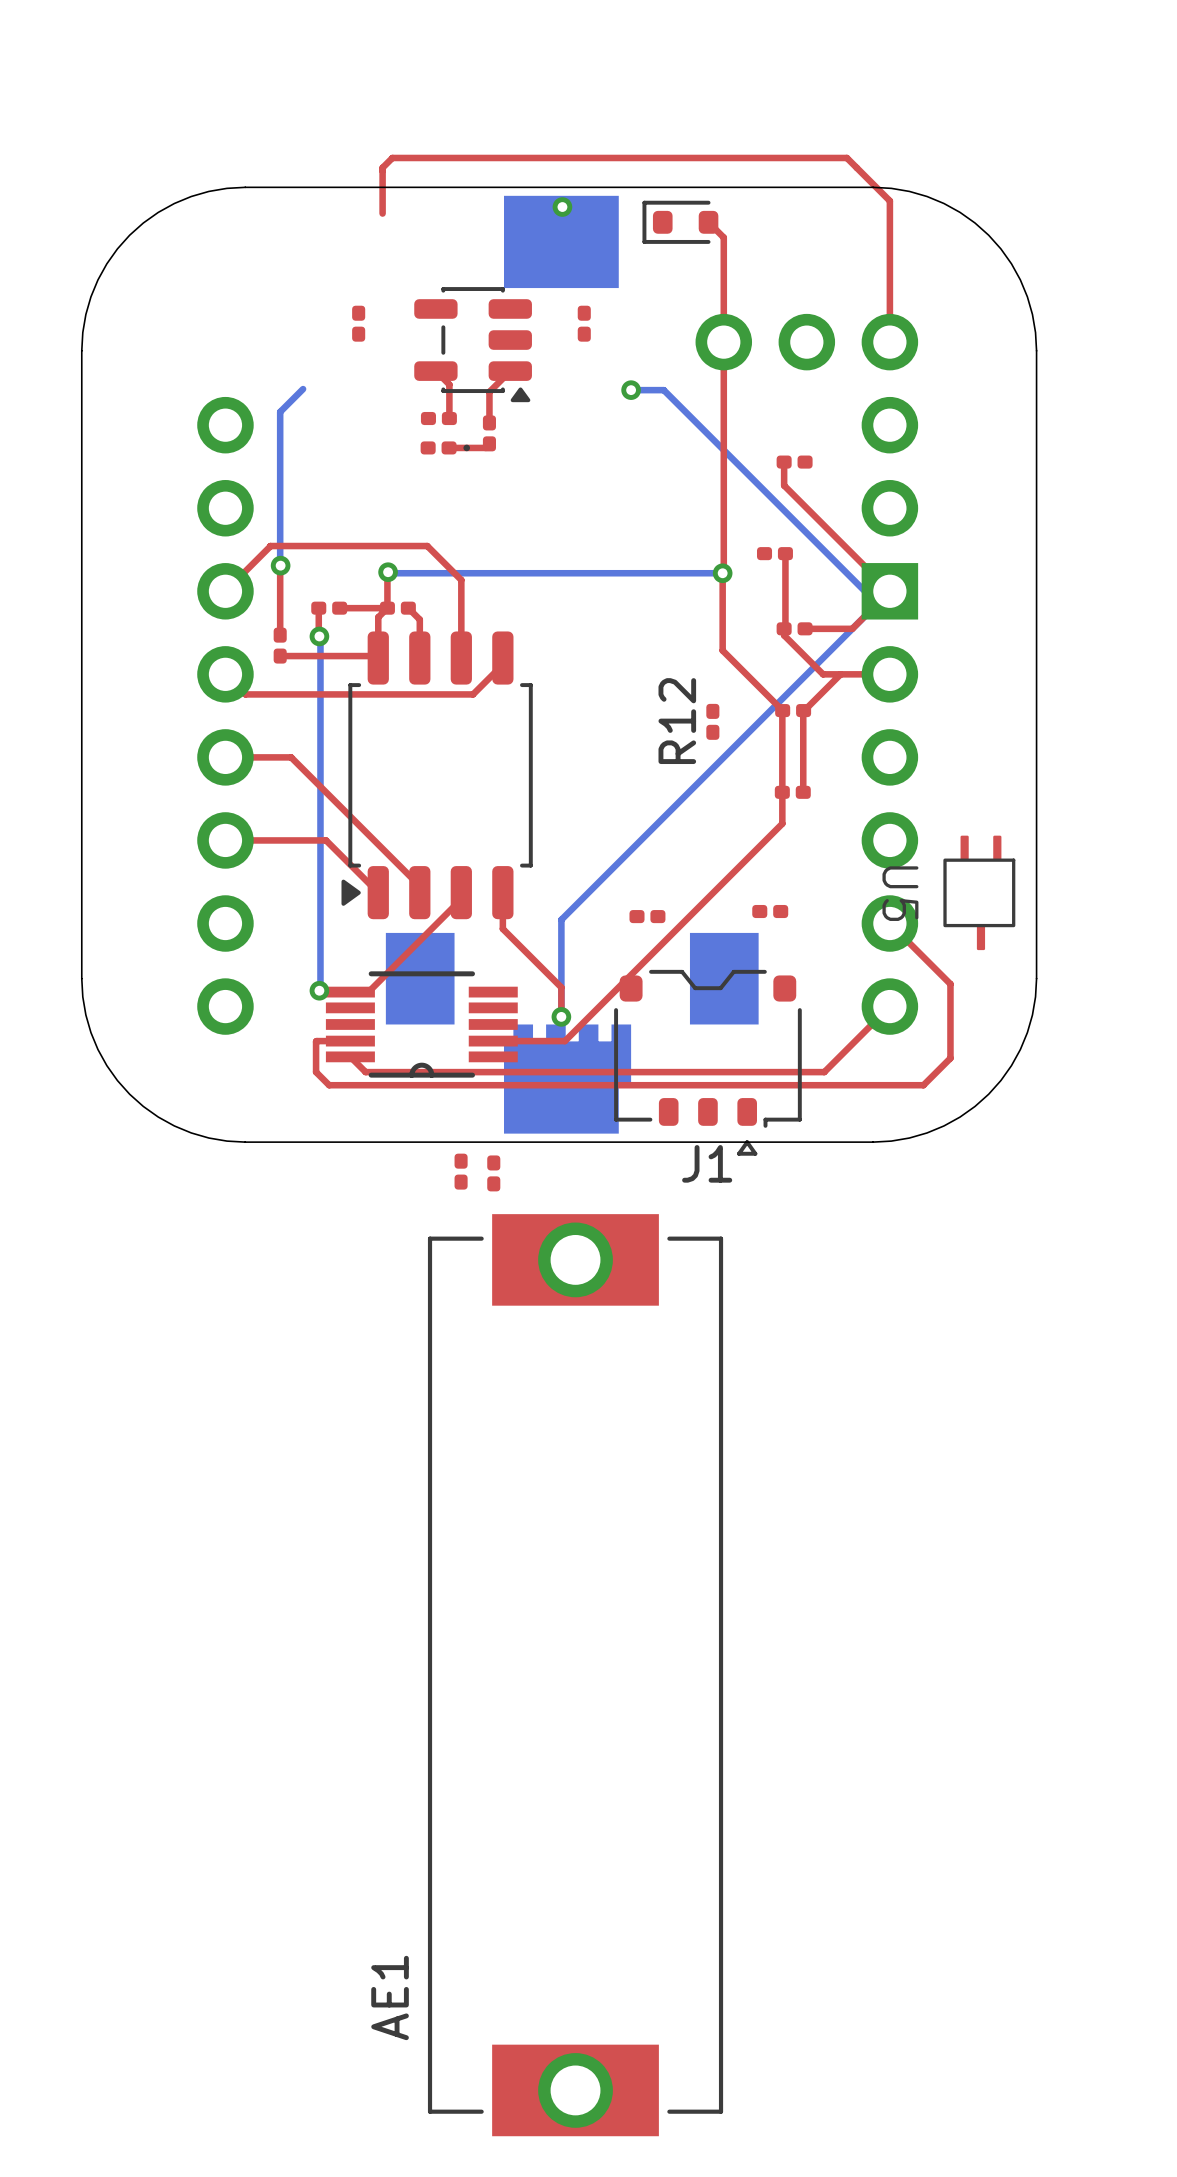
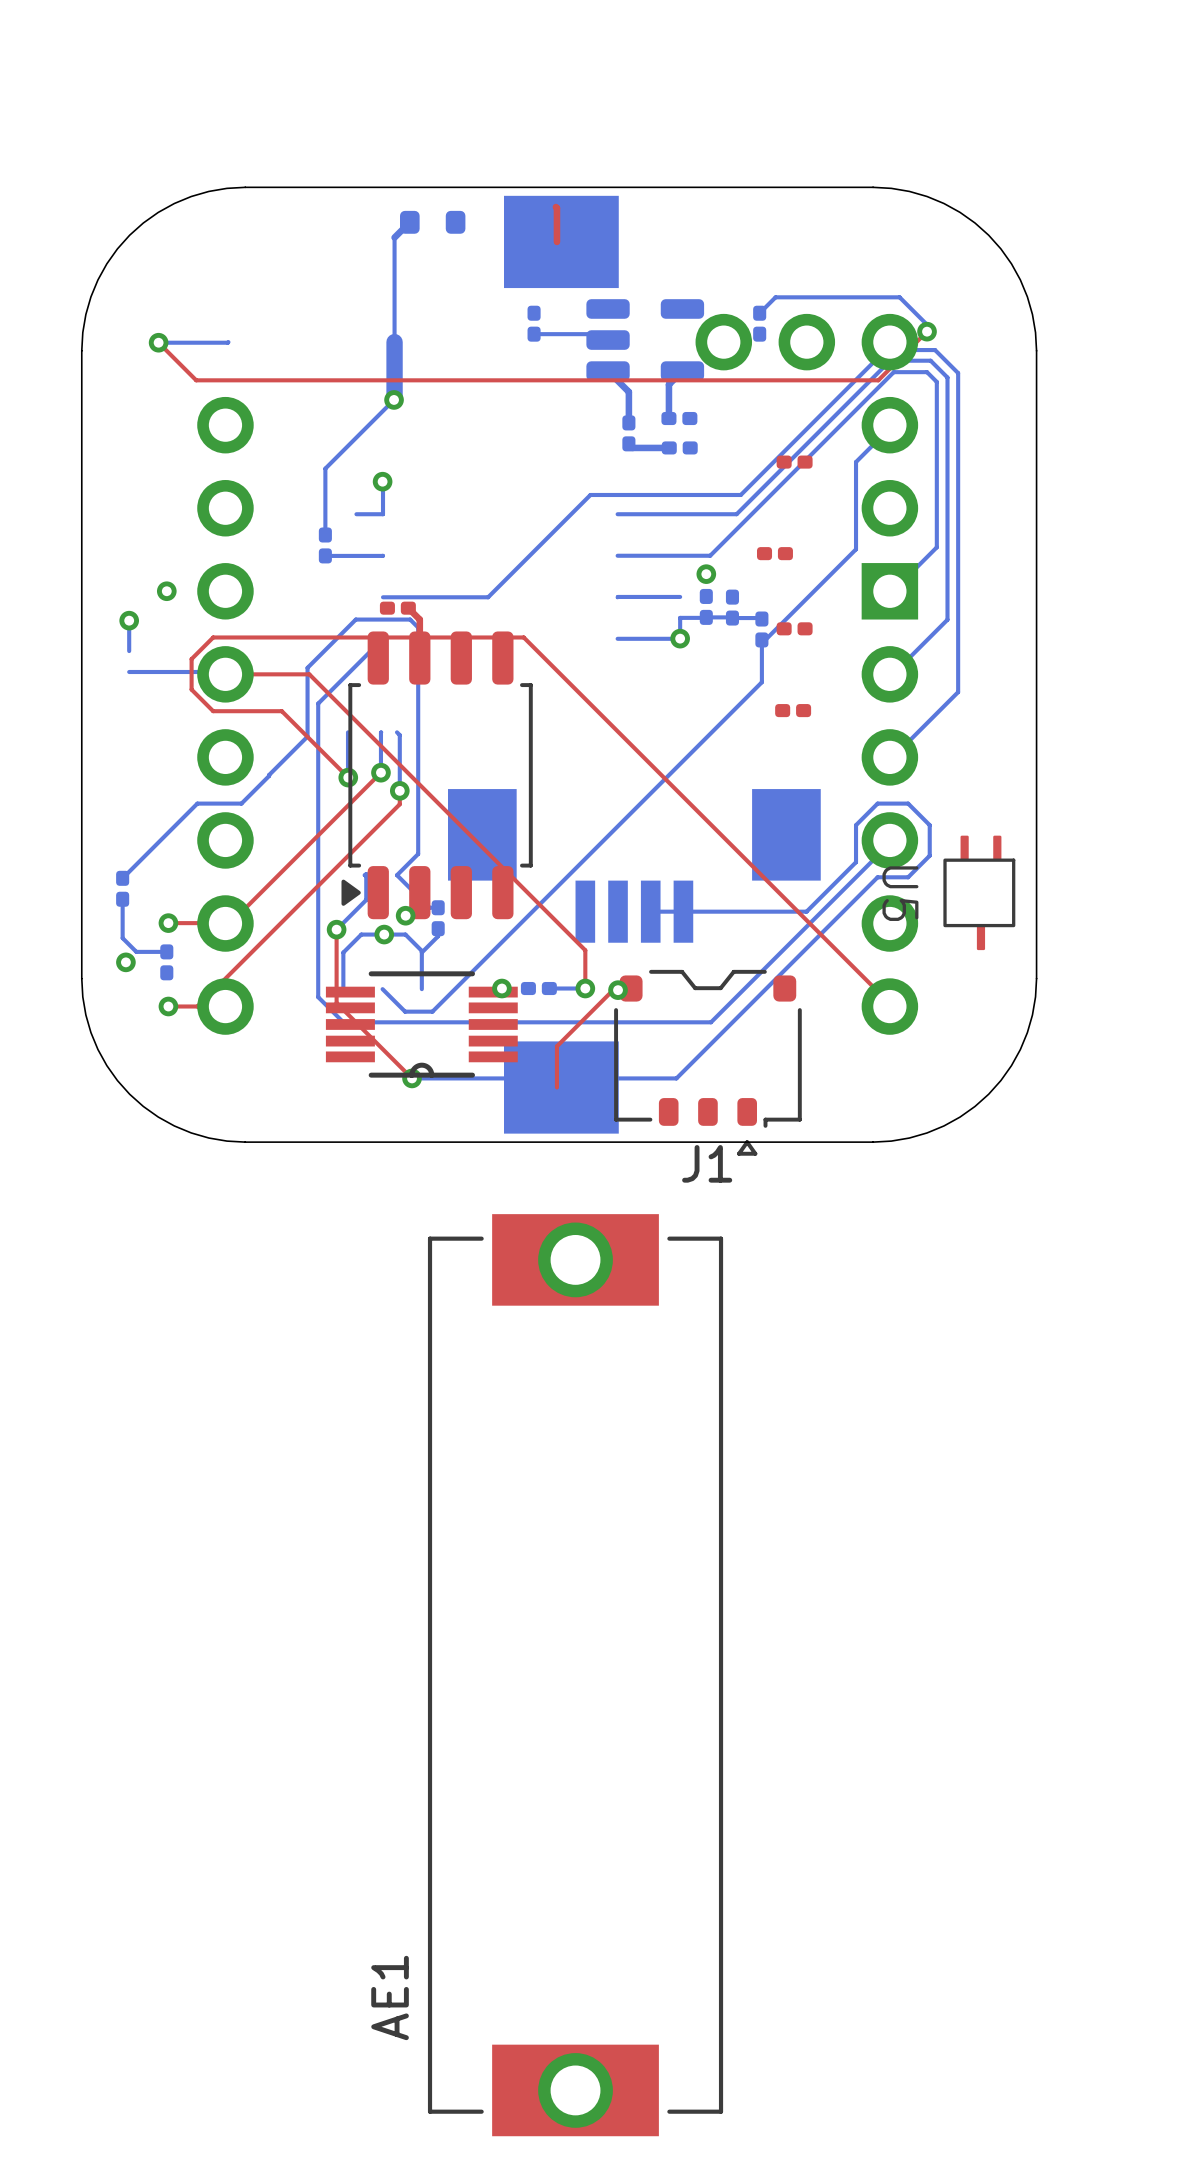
top track: none -> (555, 207) (556, 241)
via: (562, 207) -> none
top track: (382, 213) (382, 167) (392, 157) (846, 157) (889, 200) (889, 342) -> none
bottom track: none -> (409, 222) (394, 237) (394, 399) (325, 468) (325, 534)
part side: top (680, 222) -> bottom (432, 222)
top track: (708, 222) (723, 237) (722, 650) (782, 710) -> none
bottom track: none -> (759, 313) (775, 297) (899, 297) (927, 324) (927, 331)
part side: top (358, 323) -> bottom (759, 323)
part side: top (584, 323) -> bottom (534, 323)
top track: none -> (927, 331) (878, 380) (196, 380) (158, 342)
via: none -> (927, 331)
bottom track: none -> (534, 334) (602, 334) (608, 340)
via: none -> (158, 342)
bottom track: none -> (228, 342) (158, 342)
part side: top (473, 344) -> bottom (645, 340)
top track: (435, 371) (449, 384) (449, 418) -> none
top track: (510, 371) (489, 391) (489, 422) -> none
bottom track: none -> (608, 371) (628, 391) (628, 422)
bottom track: none -> (682, 371) (668, 384) (668, 418)
bottom track: (303, 389) (280, 411) (280, 565) -> none
bottom track: (631, 390) (663, 390) (864, 591) (889, 591) (561, 919) (561, 1087) -> none
via: (631, 390) -> none
via: none -> (394, 399)
part side: top (438, 418) -> bottom (679, 418)
bottom track: none -> (892, 425) (856, 462) (856, 549) (765, 639) (761, 639) (761, 682) (432, 1011) (405, 1011) (382, 989)
part side: top (489, 433) -> bottom (628, 433)
top track: (489, 443) (485, 447) (449, 447) -> none
bottom track: none -> (628, 443) (632, 447) (669, 447)
part side: top (445, 447) -> bottom (679, 447)
top track: (784, 462) (784, 485) (889, 591) (852, 628) (805, 628) -> none
via: none -> (382, 481)
bottom track: none -> (383, 482) (383, 514) (356, 514)
bottom track: none -> (617, 514) (736, 514) (890, 360) (930, 360) (947, 377) (947, 619) (892, 674)
top track: (270, 546) (427, 546) (461, 580) (461, 658) -> none
top track: (270, 546) (225, 591) -> none
top track: (785, 553) (784, 635) (823, 674) (889, 674) -> none
bottom track: none -> (325, 555) (382, 555)
bottom track: none -> (617, 555) (710, 555) (893, 372) (927, 372) (936, 381) (936, 547) (892, 591)
via: (280, 565) -> none
top track: (280, 566) (280, 635) -> none
top track: (388, 572) (387, 608) -> none
bottom track: (388, 572) (722, 573) -> none
via: (388, 572) -> none
via position: (722, 573) -> (706, 574)
via: none -> (166, 591)
bottom track: none -> (617, 596) (680, 596)
bottom track: none -> (383, 597) (488, 597) (590, 494) (740, 494) (885, 350) (935, 350) (958, 373) (958, 692) (892, 757)
part side: top (329, 608) -> bottom (325, 545)
top track: (339, 608) (387, 608) -> none
top track: (387, 608) (378, 617) (378, 658) (376, 656) (280, 656) -> none
top track: (318, 614) (319, 636) -> none
bottom track: none -> (761, 619) (680, 617) (680, 638)
bottom track: none -> (129, 620) (129, 651)
via: none -> (129, 620)
bottom track: (319, 636) (319, 990) -> none
via: (319, 636) -> none
bottom track: none -> (383, 638) (318, 703) (318, 997) (343, 1022) (711, 1022) (892, 840)
bottom track: none -> (617, 638) (679, 638)
via: none -> (680, 638)
part side: top (280, 645) -> bottom (706, 606)
top track: (502, 651) (502, 664) (473, 694) (245, 694) (225, 674) -> none
bottom track: none -> (129, 671) (226, 671) (228, 674)
top track: none -> (228, 674) (309, 674) (585, 950) (585, 988)
top track: (840, 674) (803, 710) -> none
top track: (782, 710) (782, 823) (564, 1041) (493, 1041) -> none
top track: (803, 710) (803, 792) -> none
R12 side: top (712, 721) -> bottom (761, 629)
bottom track: none -> (348, 732) (348, 777)
bottom track: none -> (380, 732) (380, 772)
bottom track: none -> (397, 732) (399, 735) (399, 790)
top track: (225, 757) (291, 757) (419, 886) (419, 892) -> none
top track: none -> (380, 772) (230, 923) (168, 923)
via: none -> (380, 772)
top track: none -> (348, 777) (281, 711) (213, 711) (191, 689) (191, 659) (213, 637) (523, 637) (892, 1006)
via: none -> (348, 777)
top track: none -> (399, 790) (399, 804) (197, 1006) (168, 1006)
via: none -> (399, 790)
part side: top (792, 792) -> bottom (538, 988)
top track: (225, 840) (326, 840) (378, 892) -> none
bottom track: none -> (365, 875) (366, 874) (366, 900) (336, 929)
bottom track: none -> (122, 878) (197, 803) (241, 803) (307, 736) (307, 667) (355, 619) (410, 619) (418, 627) (418, 854) (397, 875) (429, 907) (438, 907)
top track: (461, 892) (461, 899) (369, 990) (319, 990) -> none
top track: (502, 892) (502, 928) (561, 987) (561, 1016) -> none
bottom track: none -> (122, 899) (122, 938) (136, 951) (166, 951)
bottom track: none -> (650, 911) (806, 911) (856, 862) (856, 825) (877, 803) (908, 803) (929, 825) (929, 855) (908, 877) (877, 877) (676, 1078) (412, 1078)
part side: top (770, 911) -> bottom (732, 607)
via: none -> (405, 915)
part side: top (647, 916) -> bottom (166, 962)
via: none -> (168, 923)
top track: (889, 923) (950, 984) (950, 1058) (923, 1085) (329, 1085) (316, 1072) (316, 1041) (350, 1041) -> none
bottom track: none -> (438, 928) (438, 936) (421, 952)
top track: none -> (336, 929) (336, 1003) (412, 1078)
via: none -> (336, 929)
via: none -> (384, 934)
via: none -> (125, 962)
via: none -> (501, 988)
bottom track: none -> (549, 988) (585, 988)
via: none -> (585, 988)
bottom track: none -> (343, 989) (343, 952) (361, 934) (405, 934) (421, 950) (421, 989)
via: (319, 990) -> none
top track: none -> (618, 990) (613, 990) (556, 1046) (556, 1087)
via: none -> (618, 990)
via: none -> (168, 1006)
top track: (889, 1006) (824, 1072) (365, 1072) (350, 1056) -> none
part position: (572, 1009) -> (634, 865)
via: (561, 1016) -> none
via: none -> (412, 1078)
part side: top (461, 1171) -> bottom (438, 918)
part side: top (493, 1173) -> bottom (122, 888)

